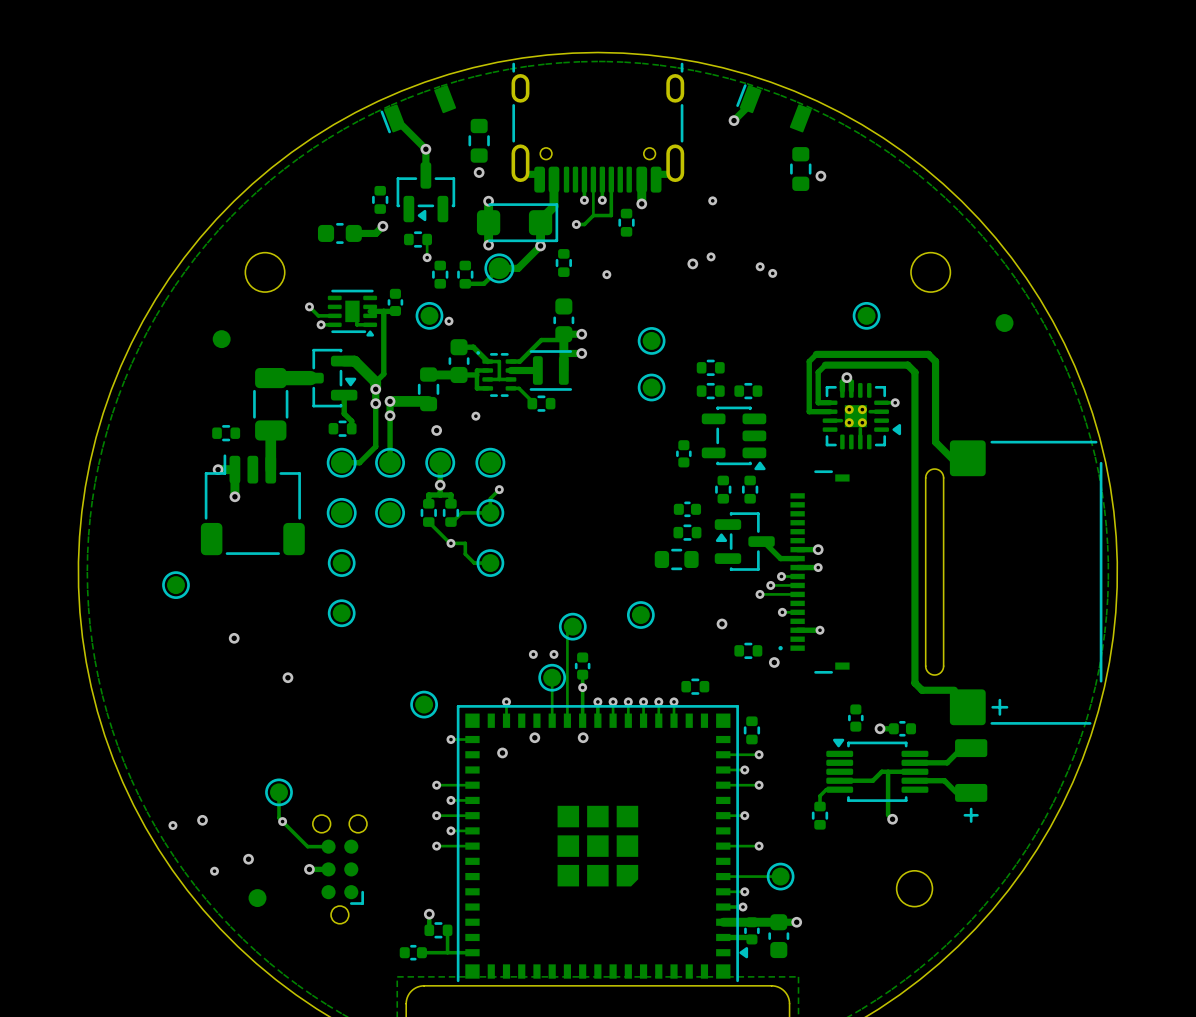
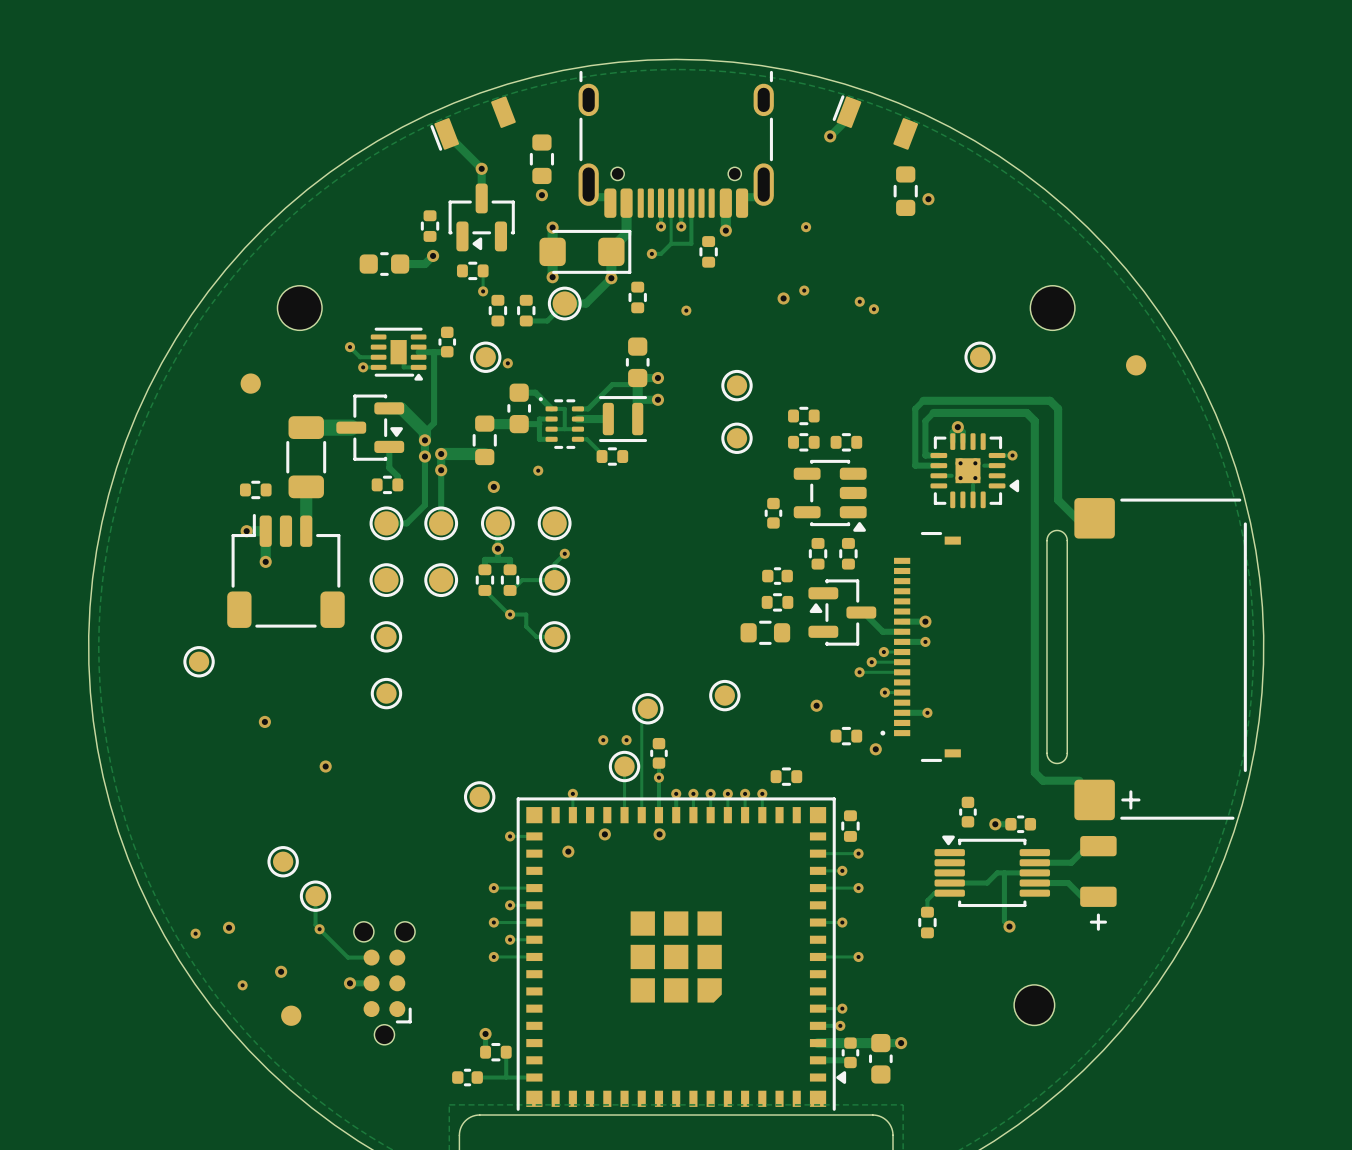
part: none -> (283, 861)
track: (780, 876) (723, 876) -> none
part: (780, 876) -> none

